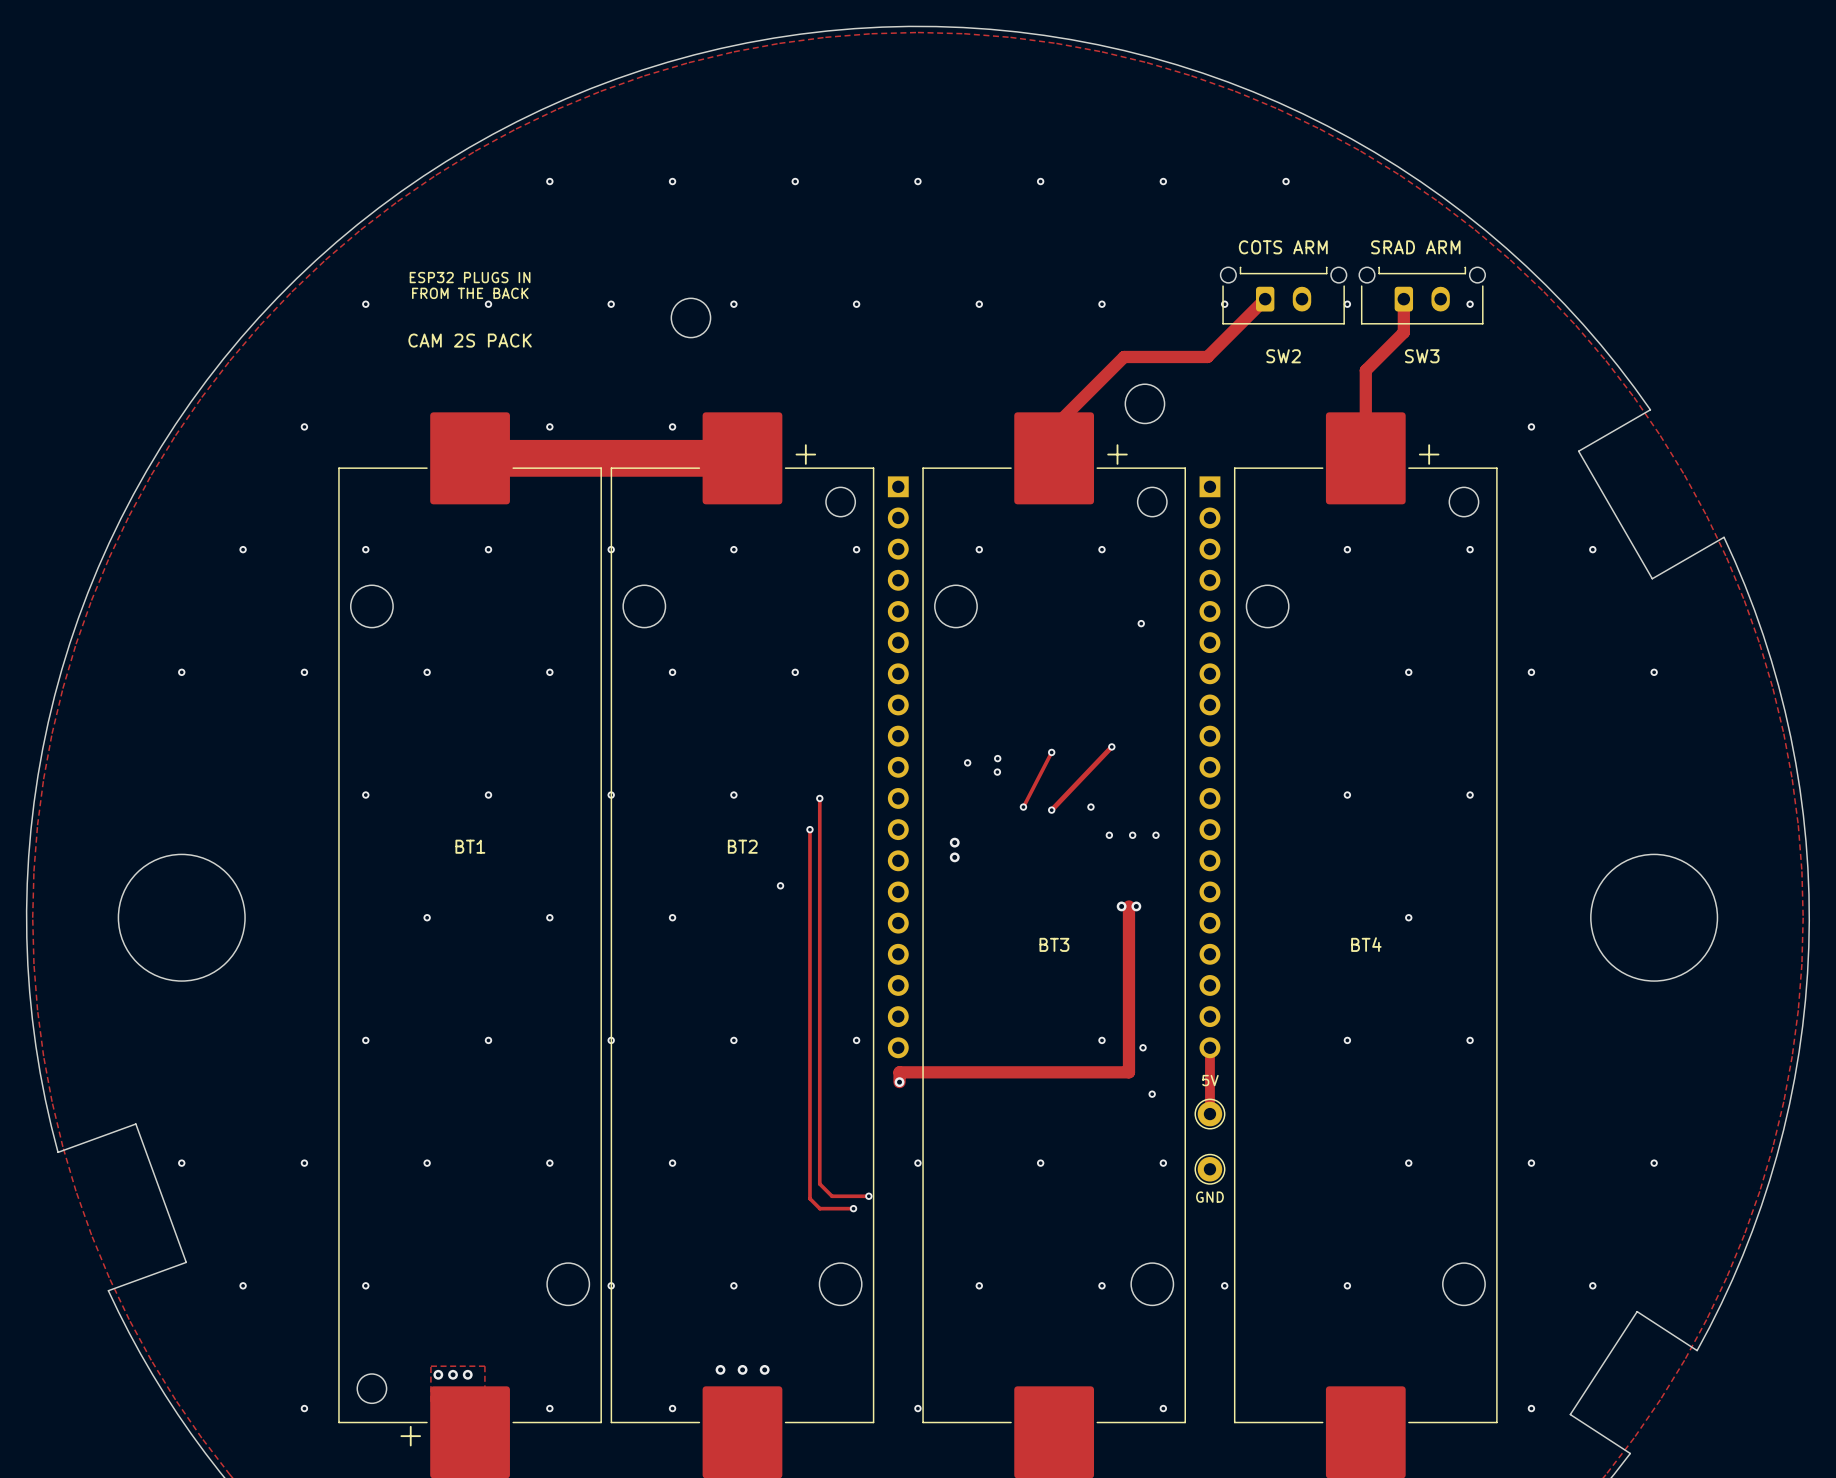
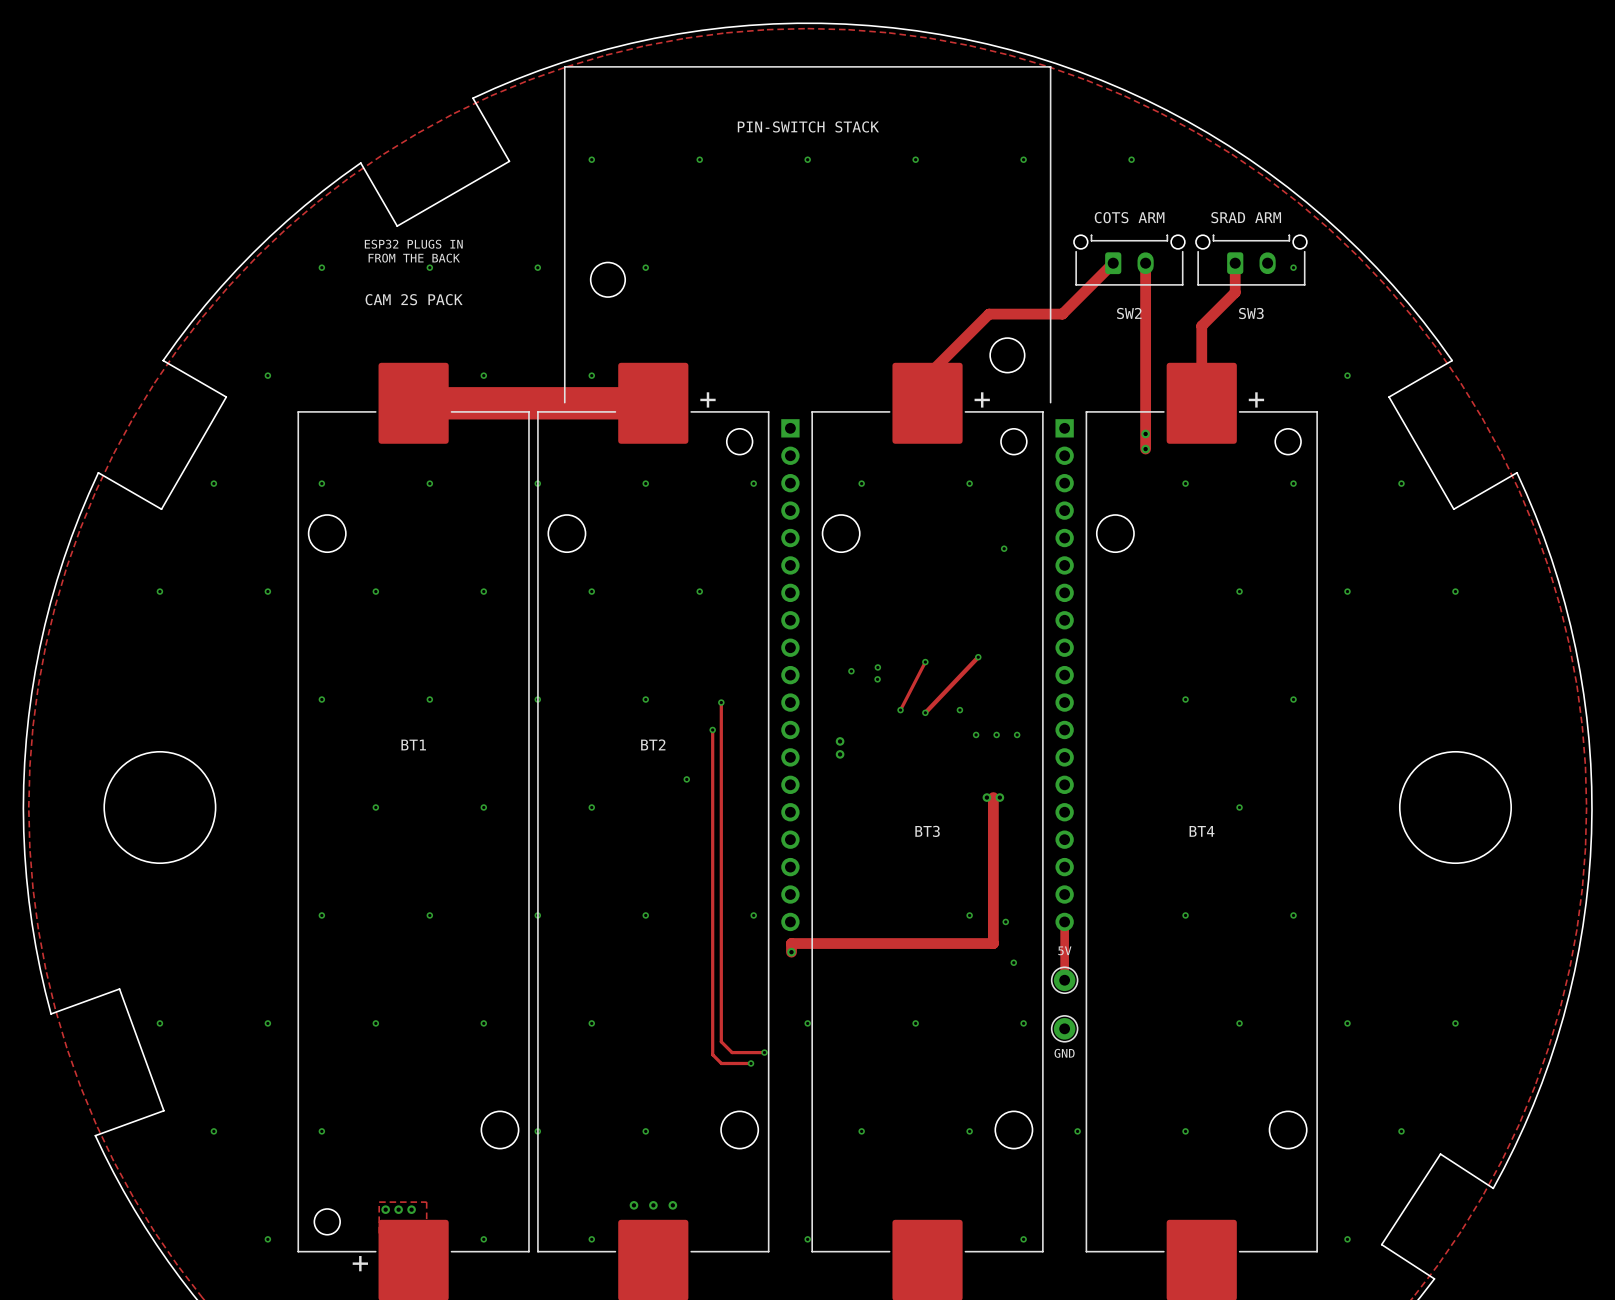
text: none -> PIN-SWITCH STACK (808, 126)
via: (549, 181) -> none
track: none -> (1145, 263) (1145, 449)
via: (856, 304) -> none
via: (979, 304) -> none
via: (1101, 304) -> none
via: (1224, 304) -> none
via: (1347, 304) -> none
board edge: (1650, 409) (1601, 345) (1545, 285) (1485, 230) (1420, 181) (1374, 152) (1303, 113) (1228, 82) (1150, 57) (1071, 39) (990, 29) (909, 26) (854, 28) (773, 38) (694, 54) (616, 78) (541, 109) (469, 147) (400, 191) (336, 242) (277, 297) (223, 358) (175, 424) (133, 494) (109, 542) (87, 592) (61, 669) (42, 749) (30, 829) (26, 910) (29, 992) (40, 1072) (58, 1152) -> (1452, 360) (1408, 303) (1359, 250) (1306, 202) (1249, 159) (1187, 121) (1145, 99) (1079, 71) (1010, 49) (940, 34) (869, 25) (821, 23) (749, 25) (678, 33) (607, 49) (539, 70) (472, 98) (509, 161) (397, 226) (360, 162) (341, 176) (304, 205) (253, 252) (205, 304) (163, 360) (226, 397) (161, 509) (98, 472) (71, 536) (50, 602) (35, 670) (26, 739) (23, 808) (26, 877) (35, 946) (51, 1013)
line: none -> (564, 402) (564, 66) (1050, 66) (1050, 402)
via: none -> (1145, 433)
via: none -> (1145, 449)

